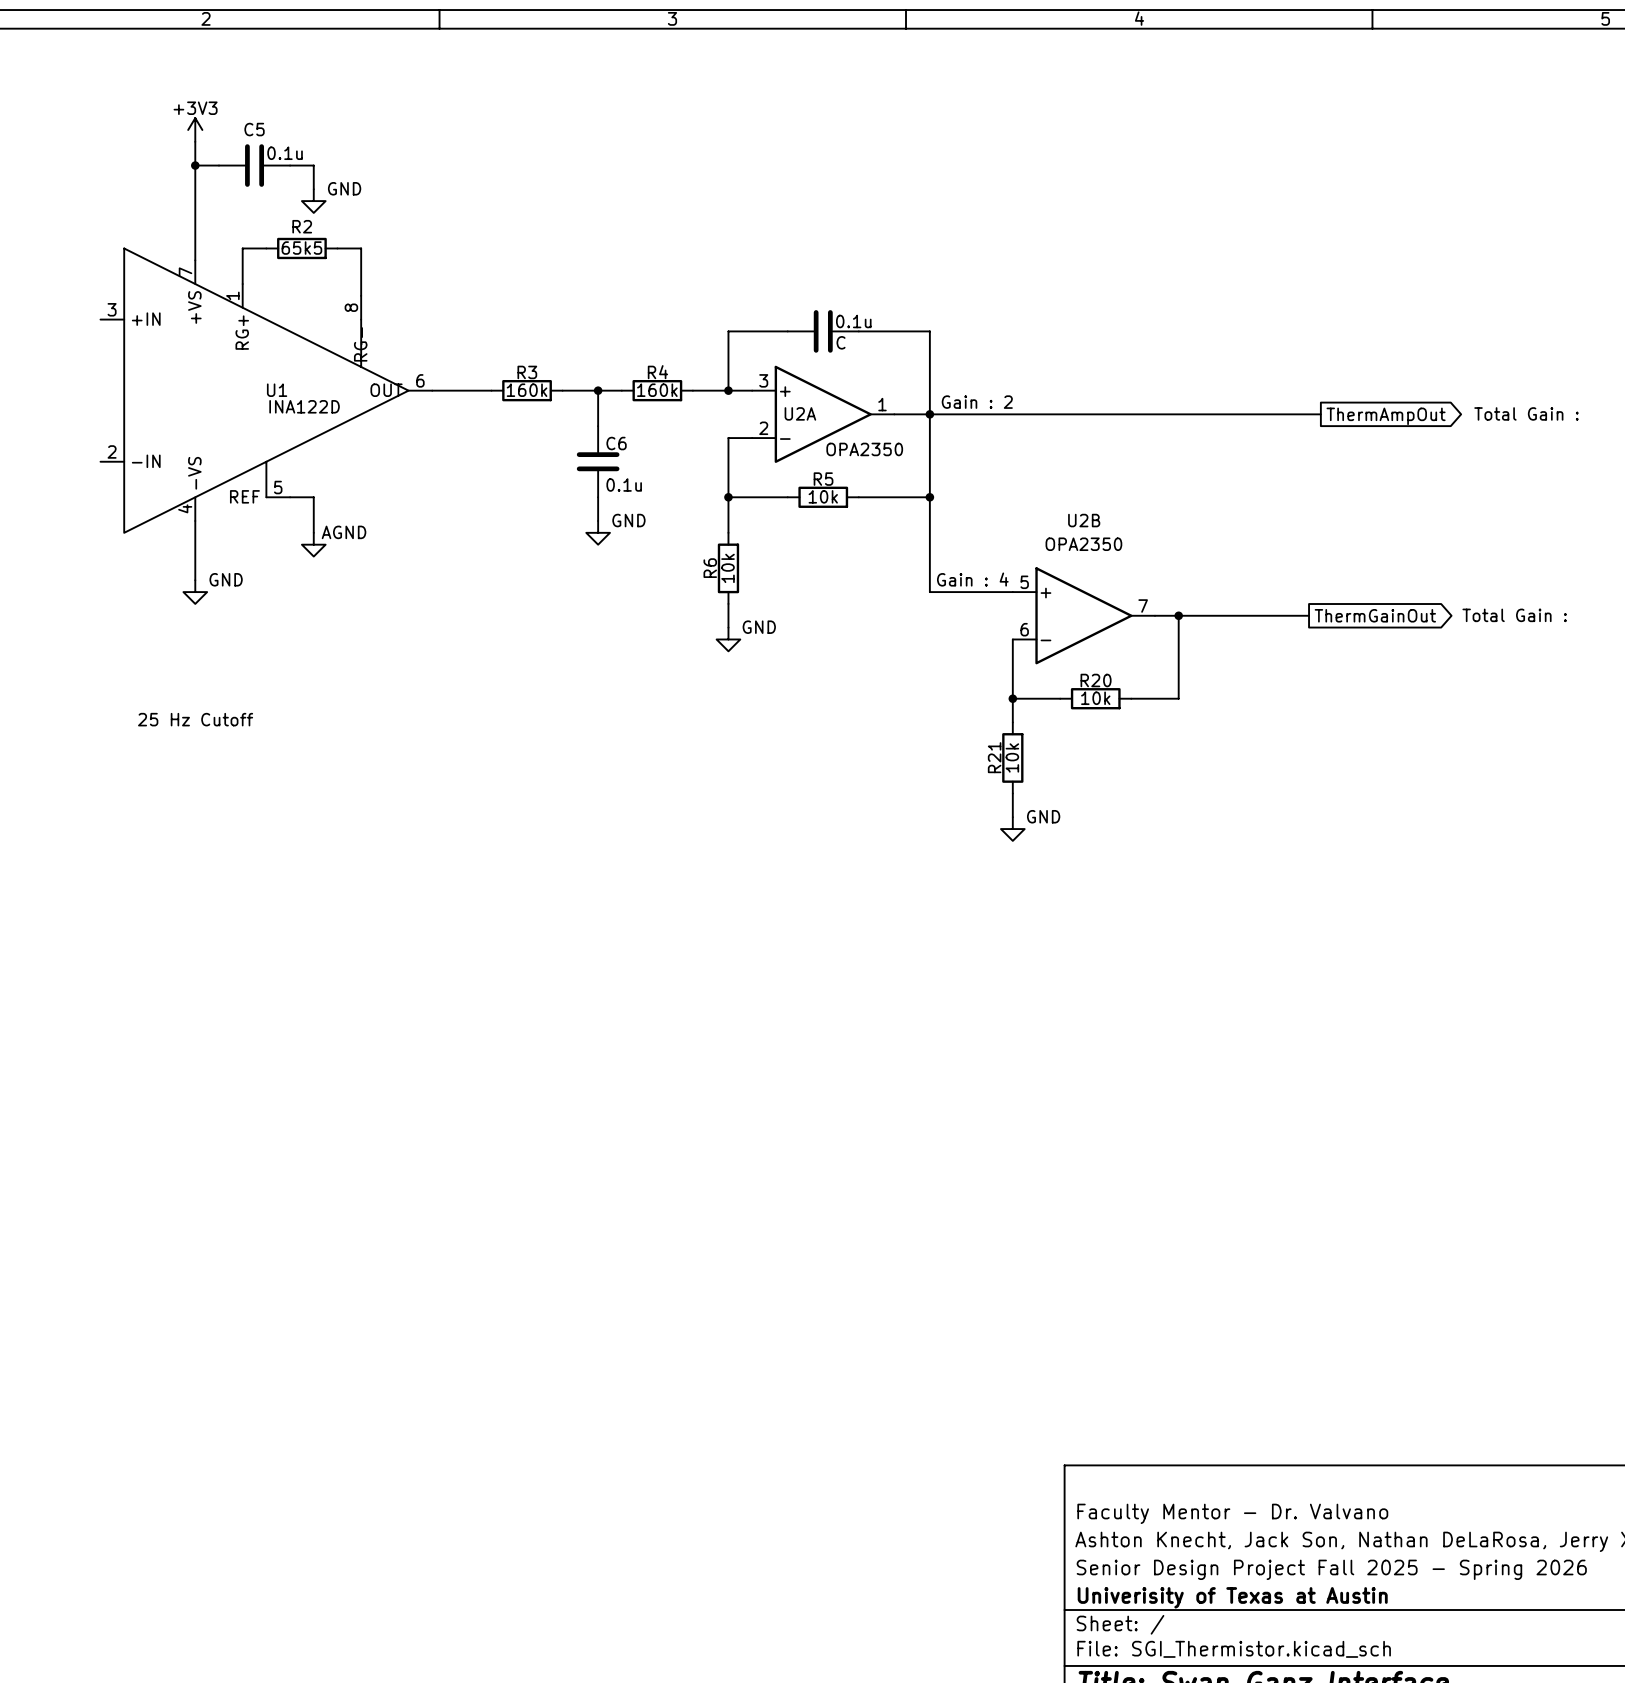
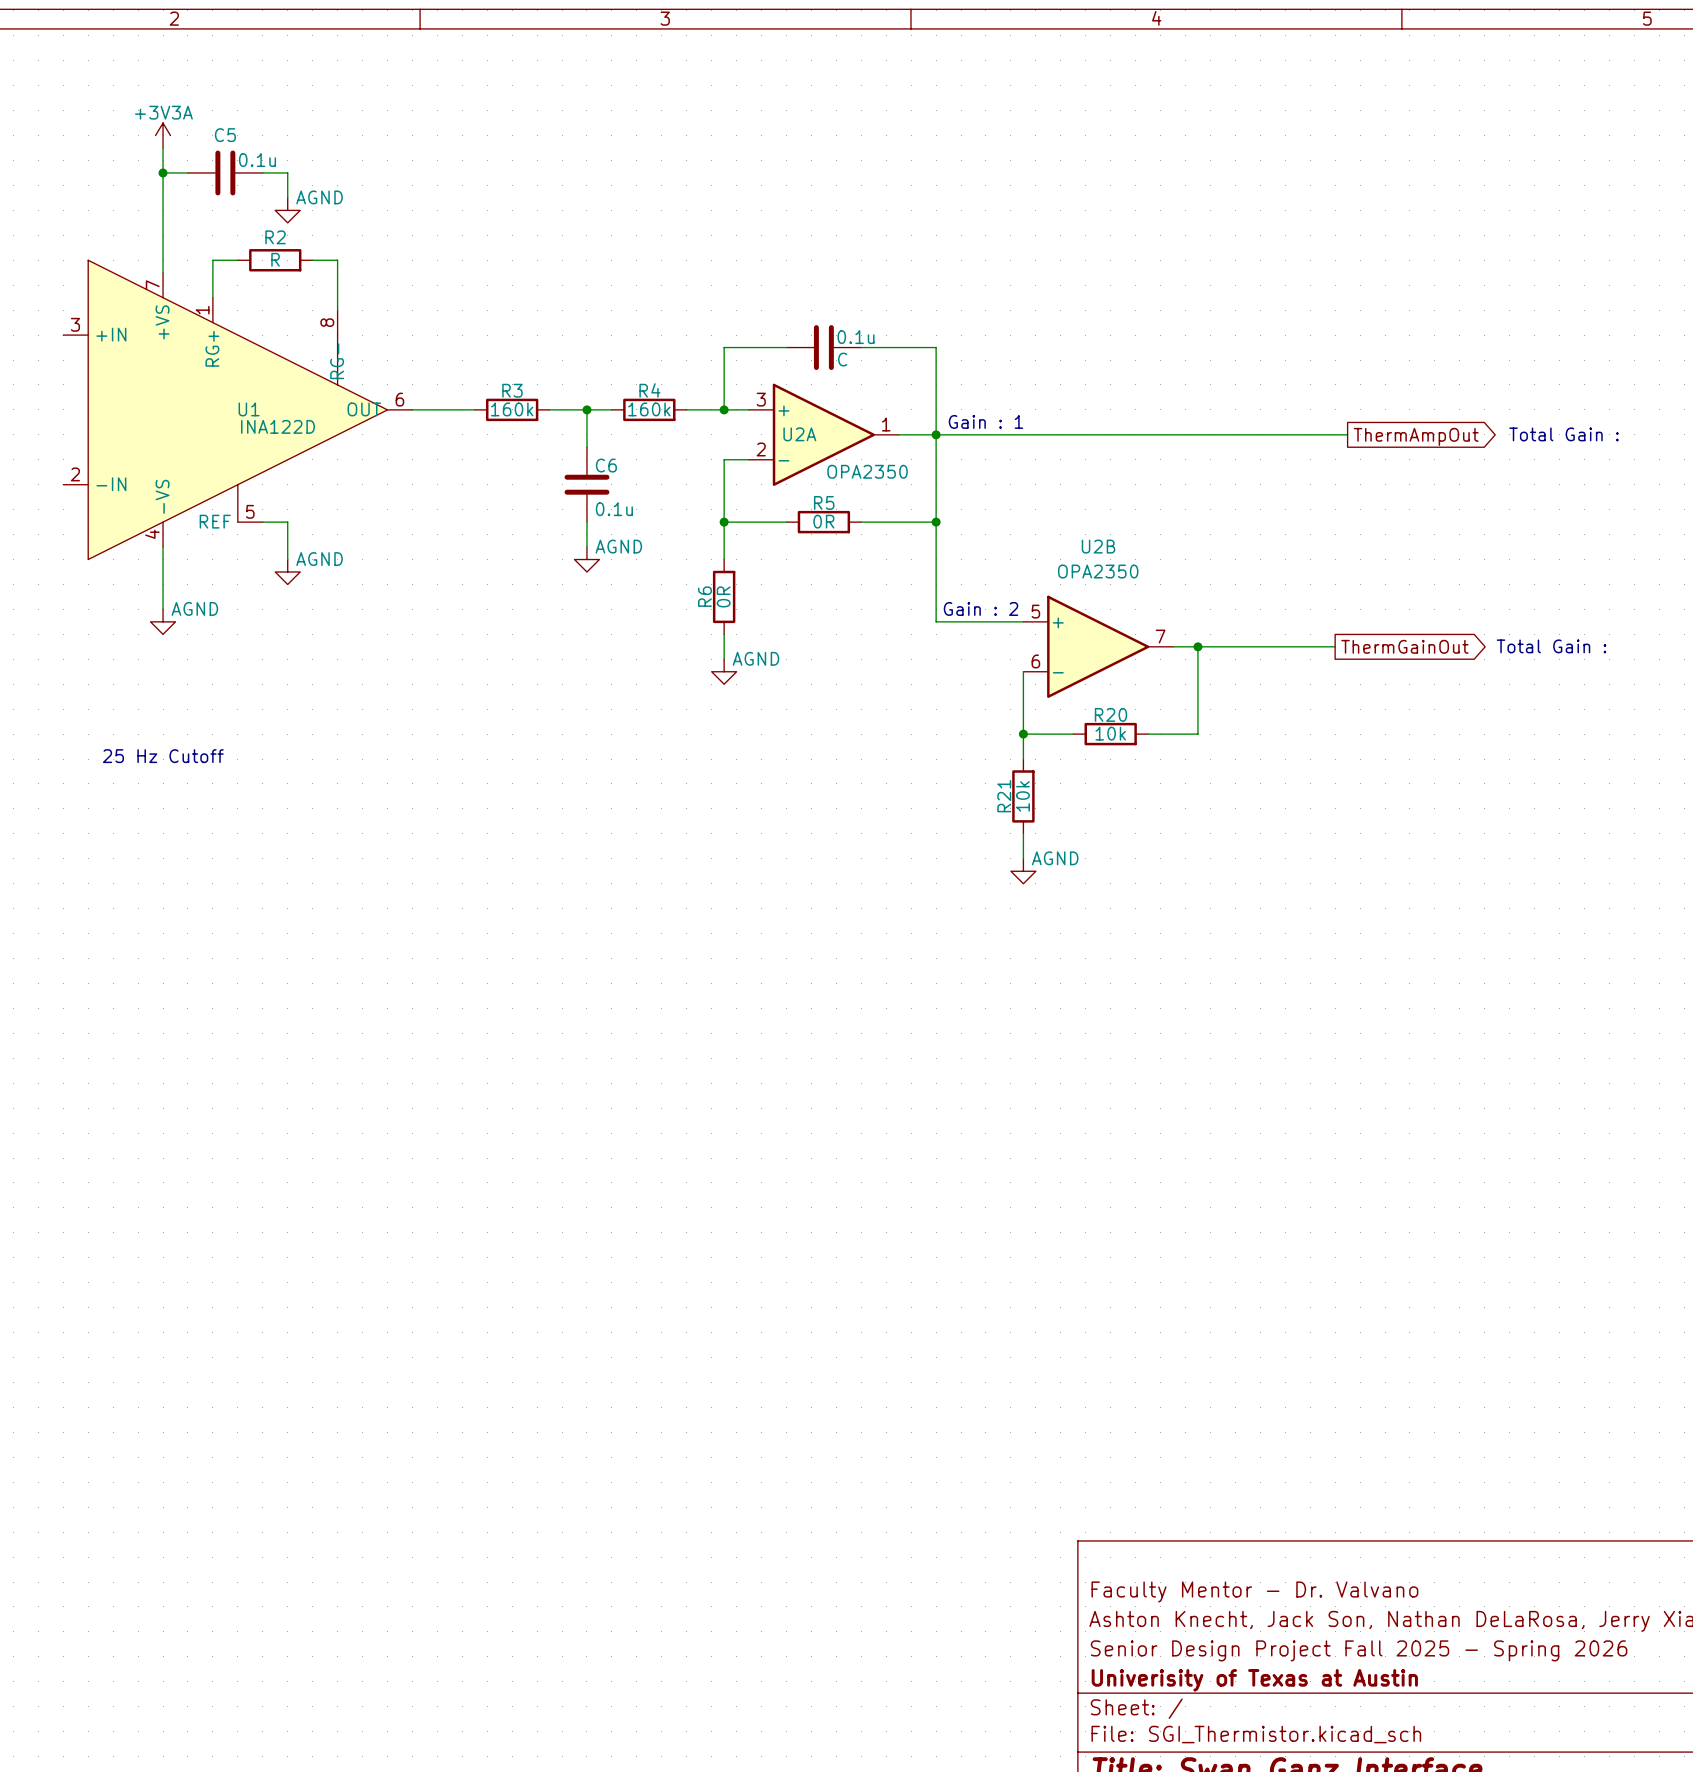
power symbol: +3V3 (195, 129) -> +3V3A (163, 135)
power symbol: GND (313, 201) -> AGND (287, 210)
R2 value: 65k5 (301, 248) -> R (275, 259)
text: Gain : 2 (977, 402) -> Gain : 1 (985, 421)
R5 value: 10k (823, 496) -> 0R (823, 521)
power symbol: GND (598, 532) -> AGND (586, 559)
R6 value: 10k (728, 568) -> 0R (723, 596)
text: Gain : 4 (972, 579) -> Gain : 2 (981, 608)
power symbol: GND (195, 592) -> AGND (163, 621)
power symbol: GND (728, 639) -> AGND (724, 671)
power symbol: GND (1012, 829) -> AGND (1023, 871)

